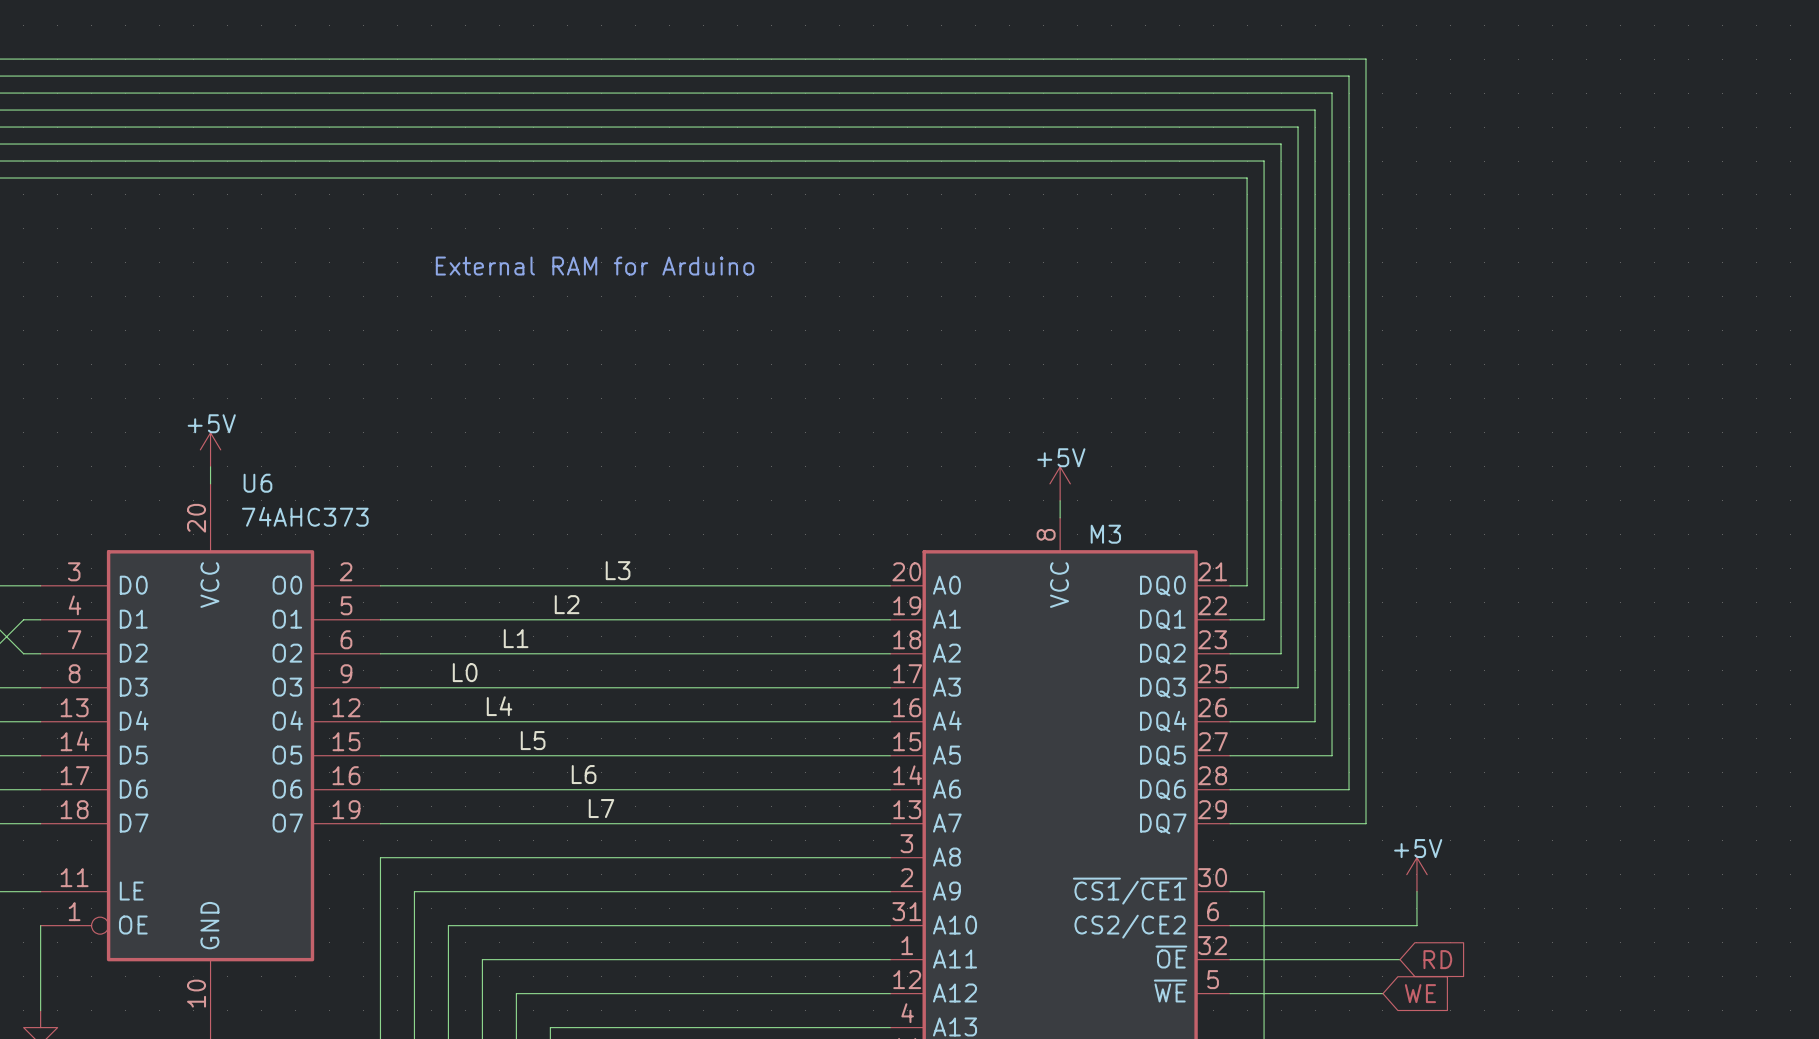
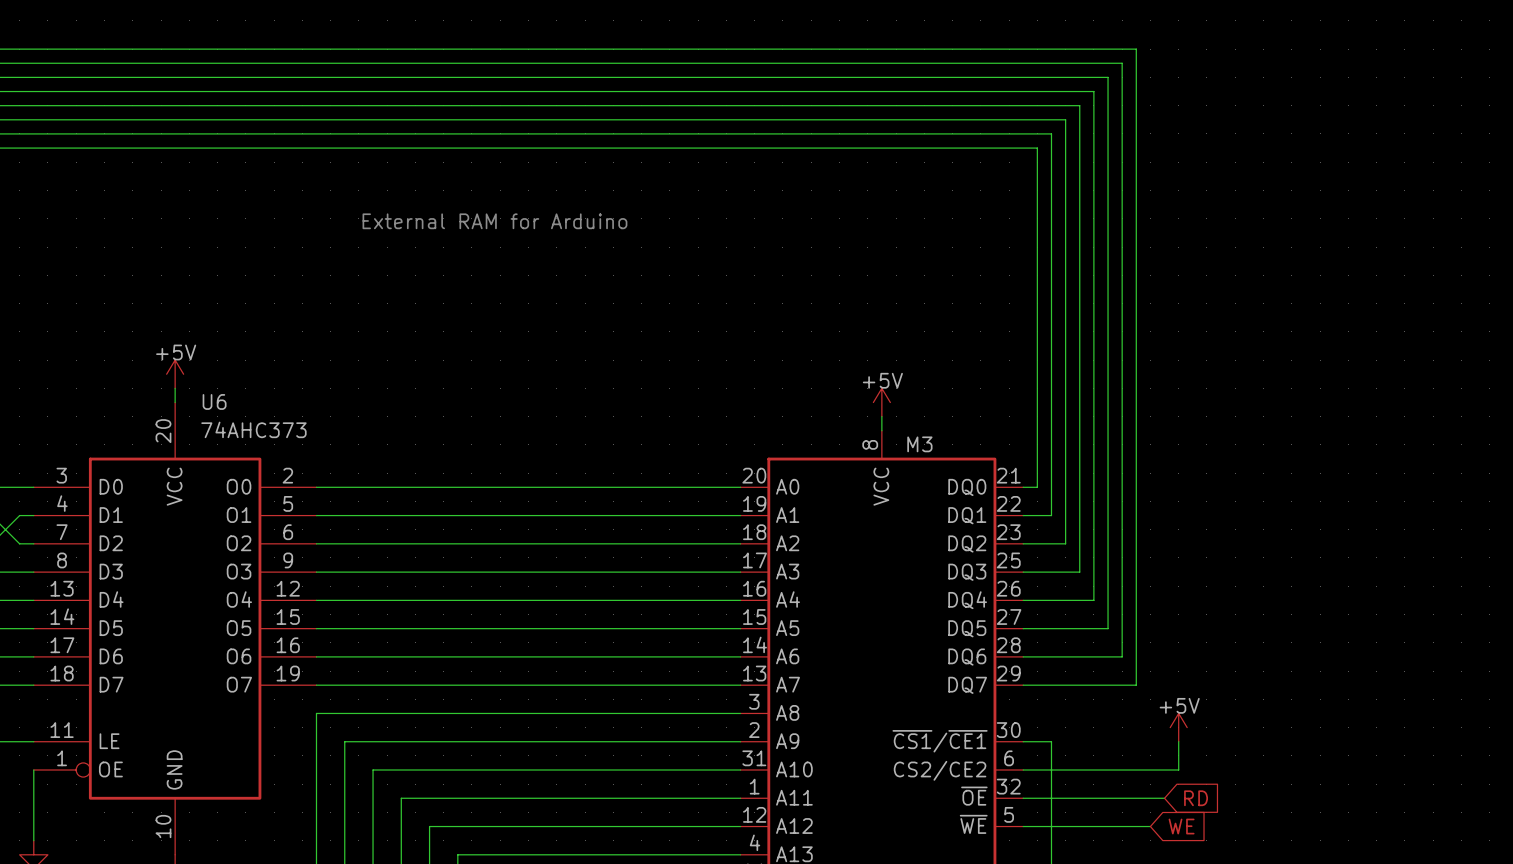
label: L3 (618, 570) -> none
label: L2 (567, 604) -> none
label: L1 (516, 638) -> none
label: L0 (465, 672) -> none
label: L4 (499, 706) -> none
label: L5 (533, 740) -> none
label: L6 (584, 774) -> none
label: L7 (601, 808) -> none

